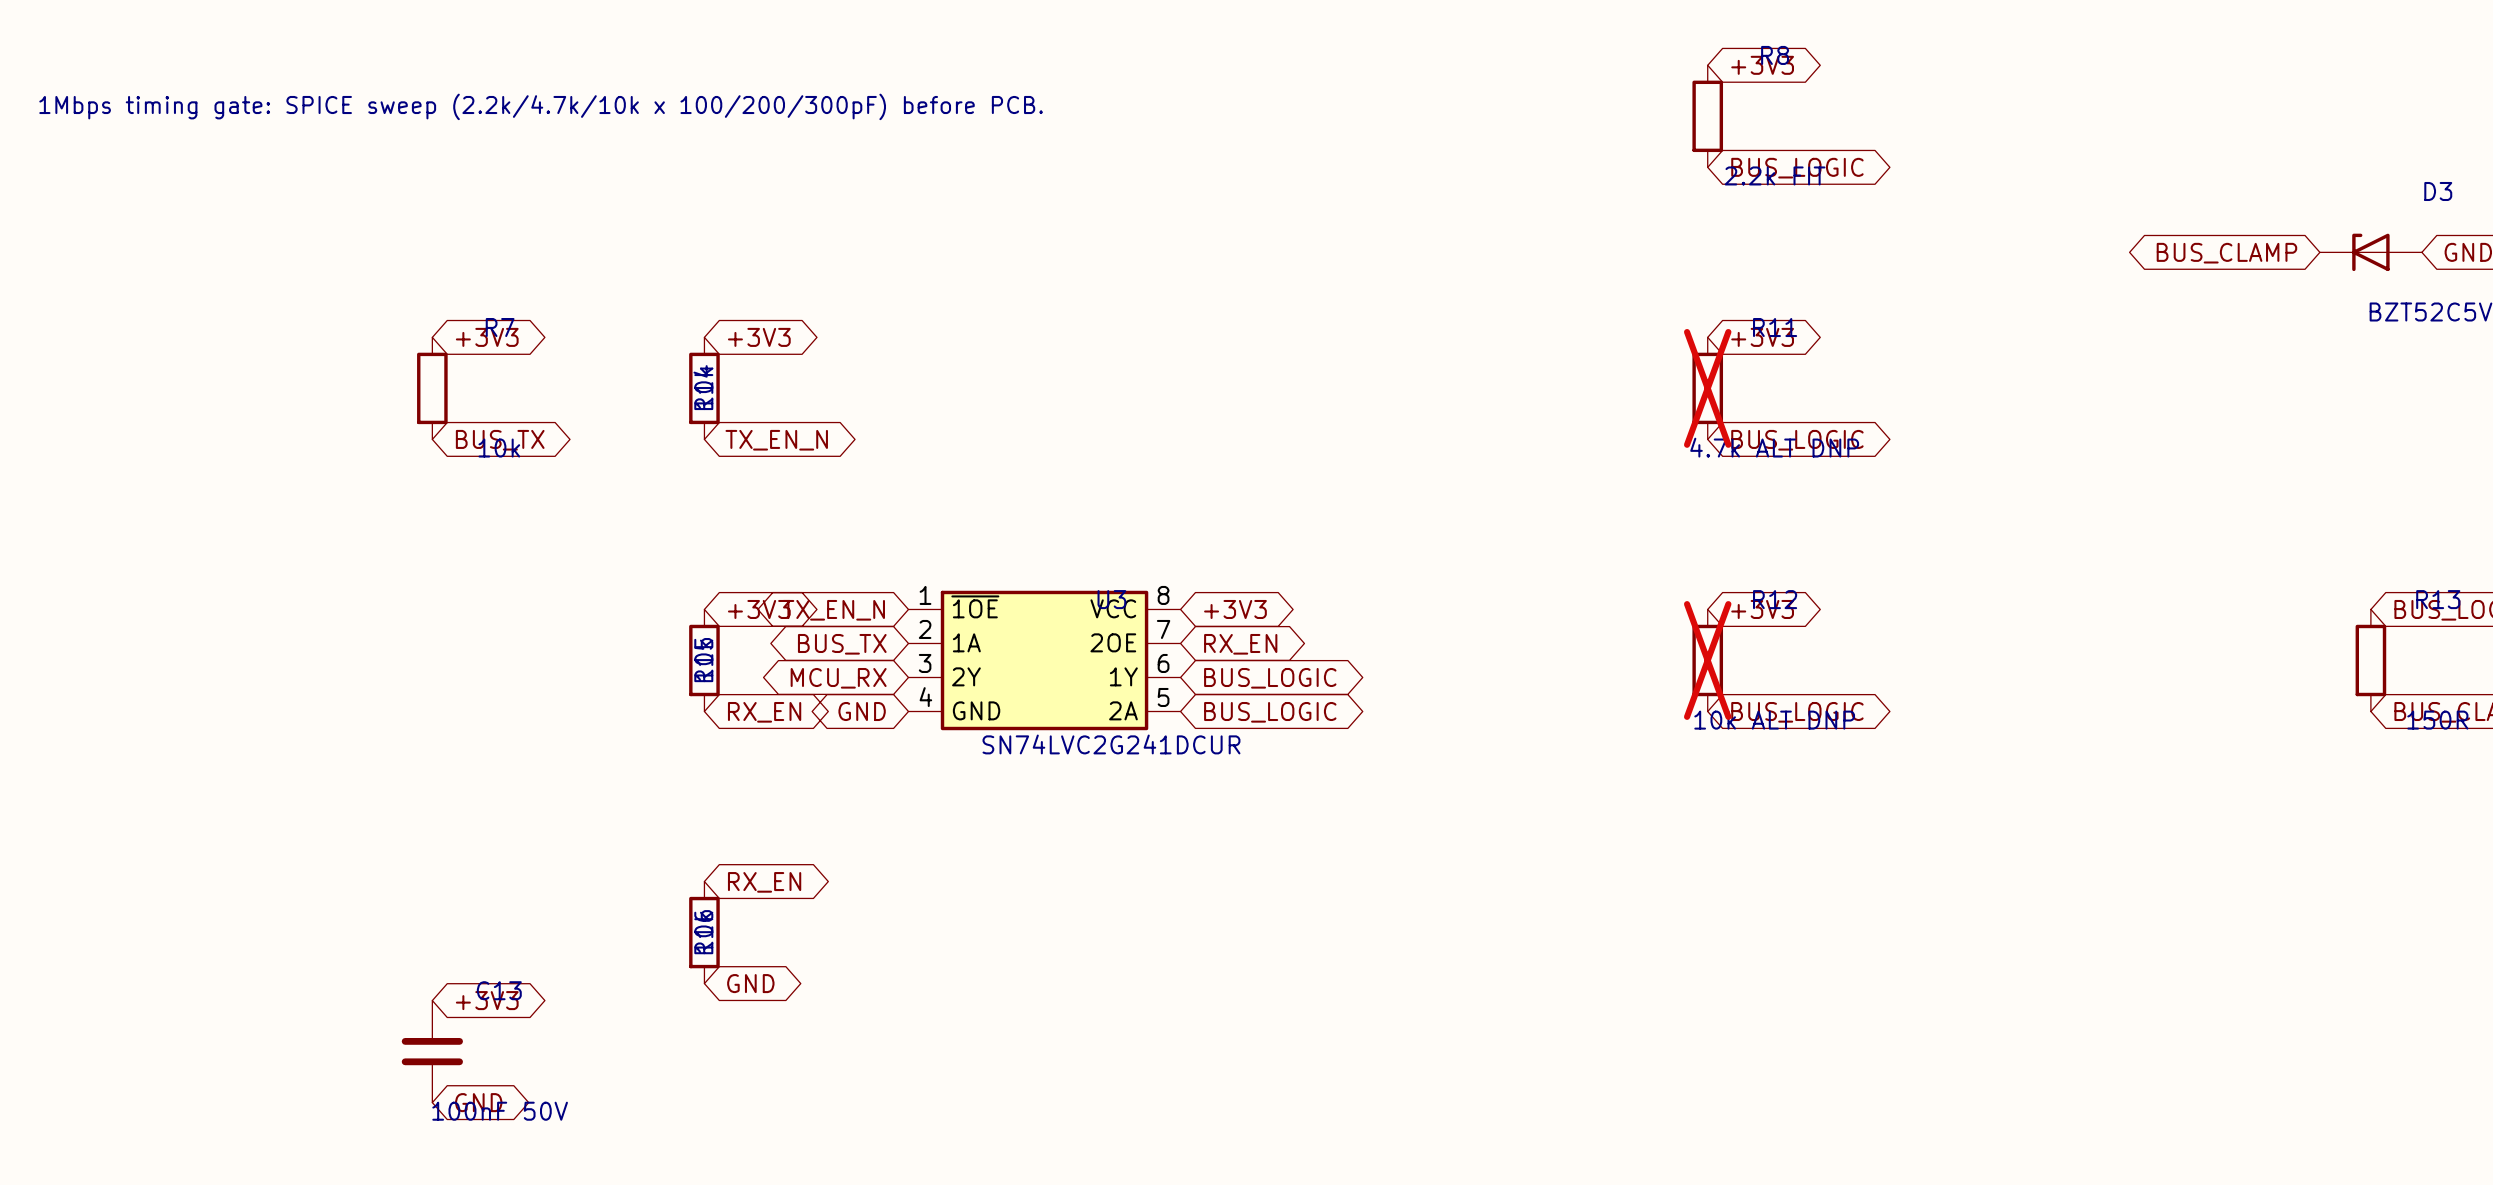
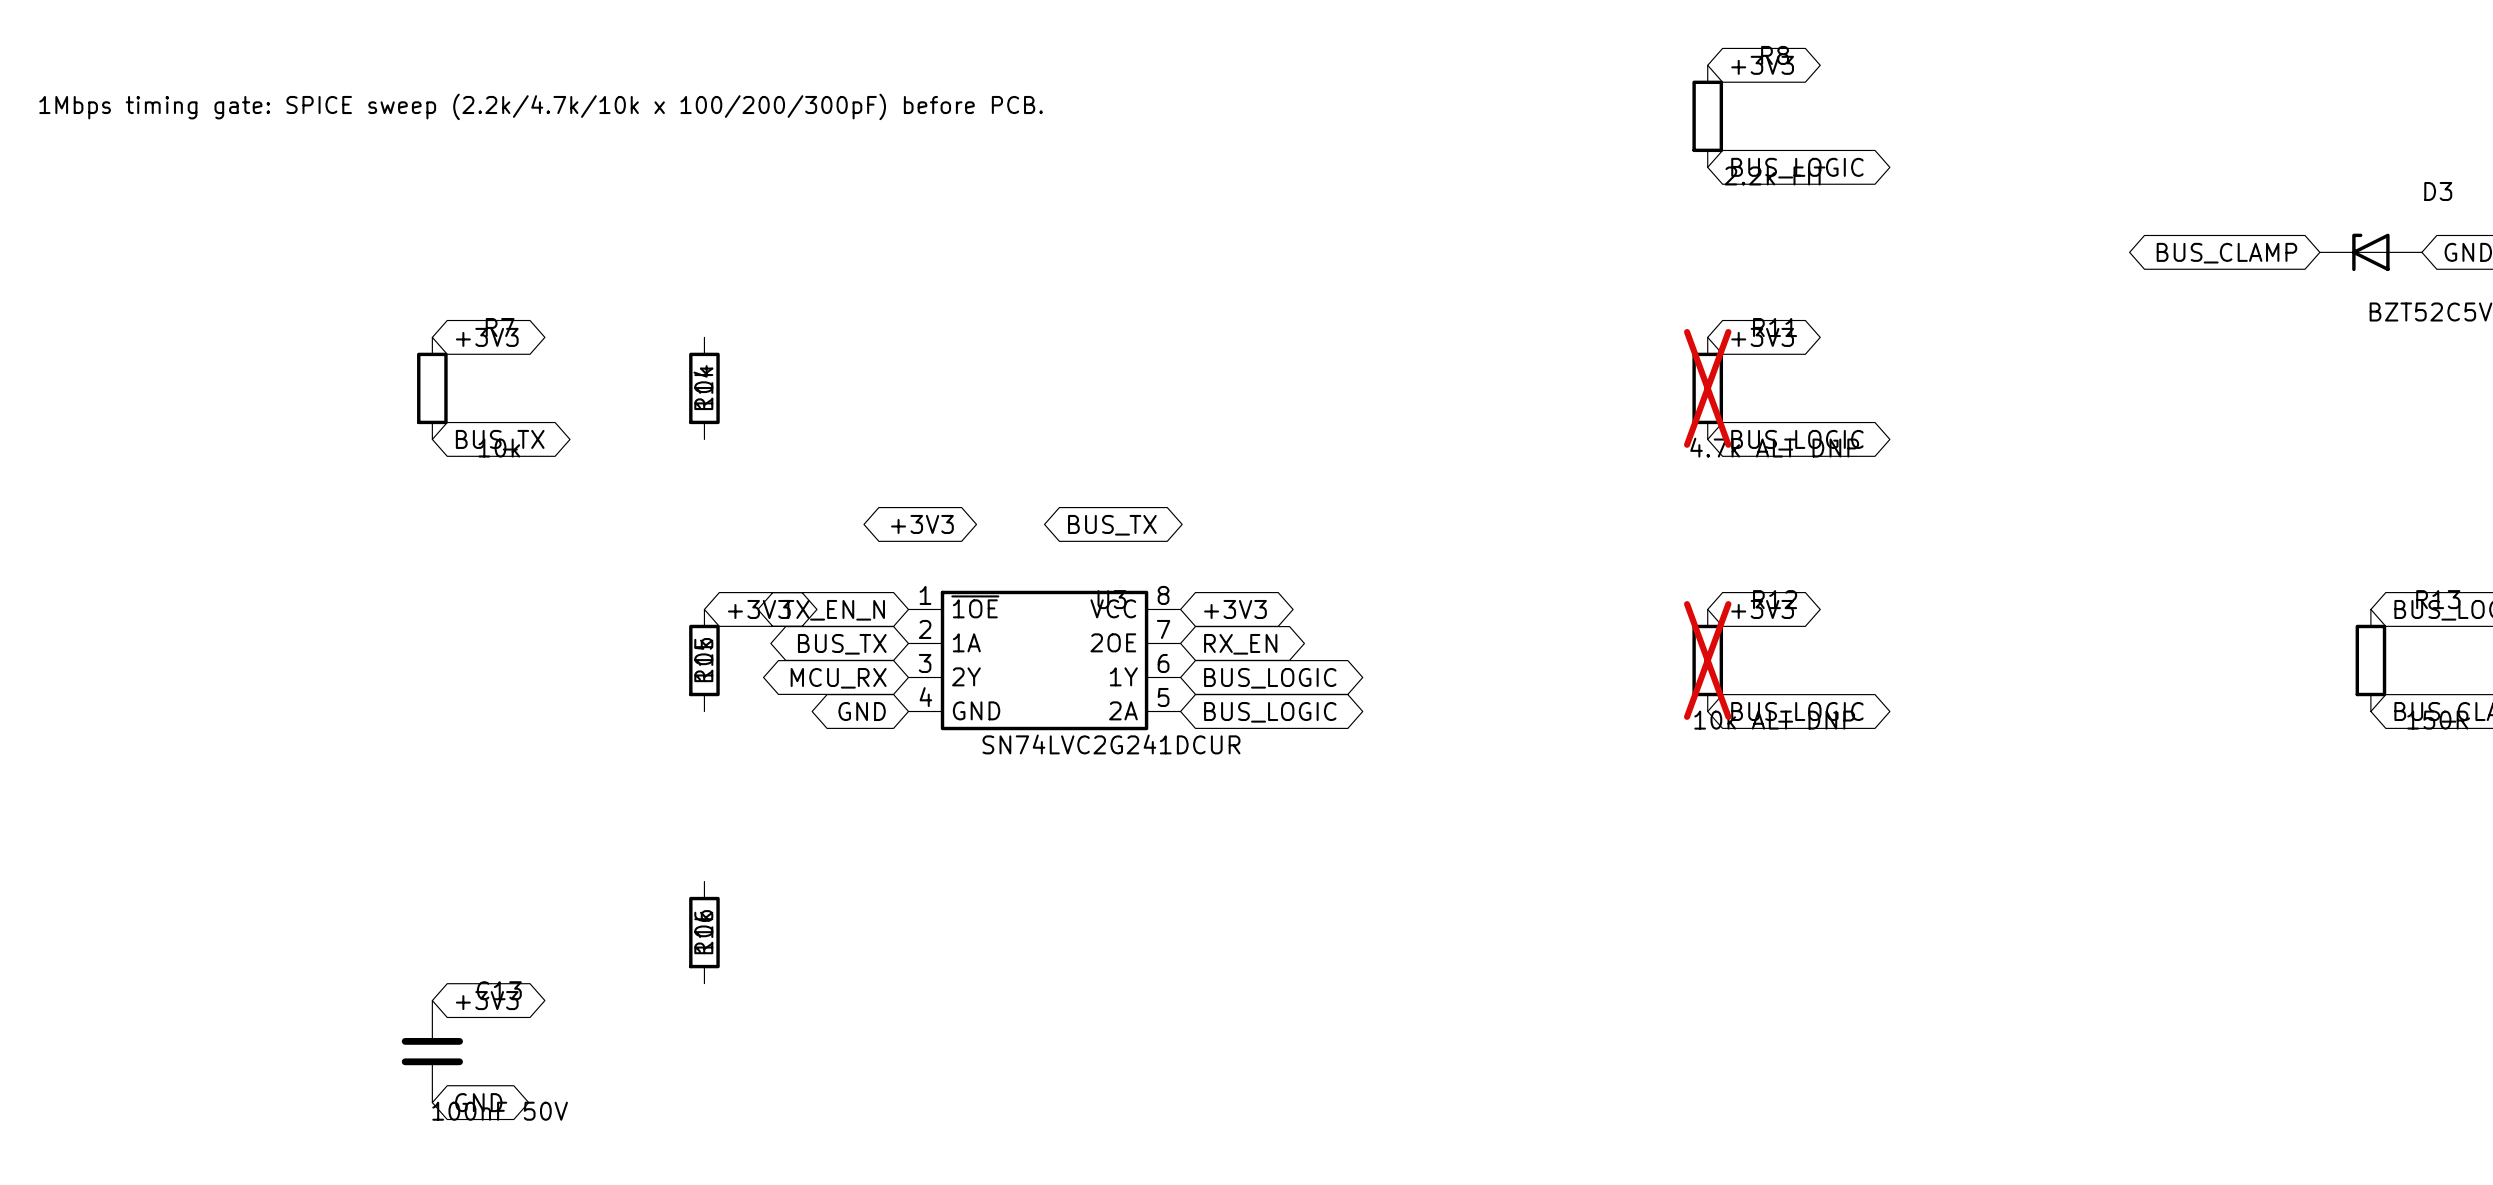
global label rotation: 0° (759, 337) -> 180° (922, 524)
global label position: +3V3 (759, 337) -> +3V3 (922, 524)
global label: TX_EN_N (776, 440) -> none
global label: none -> BUS_TX (1112, 525)
global label: RX_EN (764, 712) -> none
global label: RX_EN (764, 882) -> none
global label: GND (750, 983) -> none

